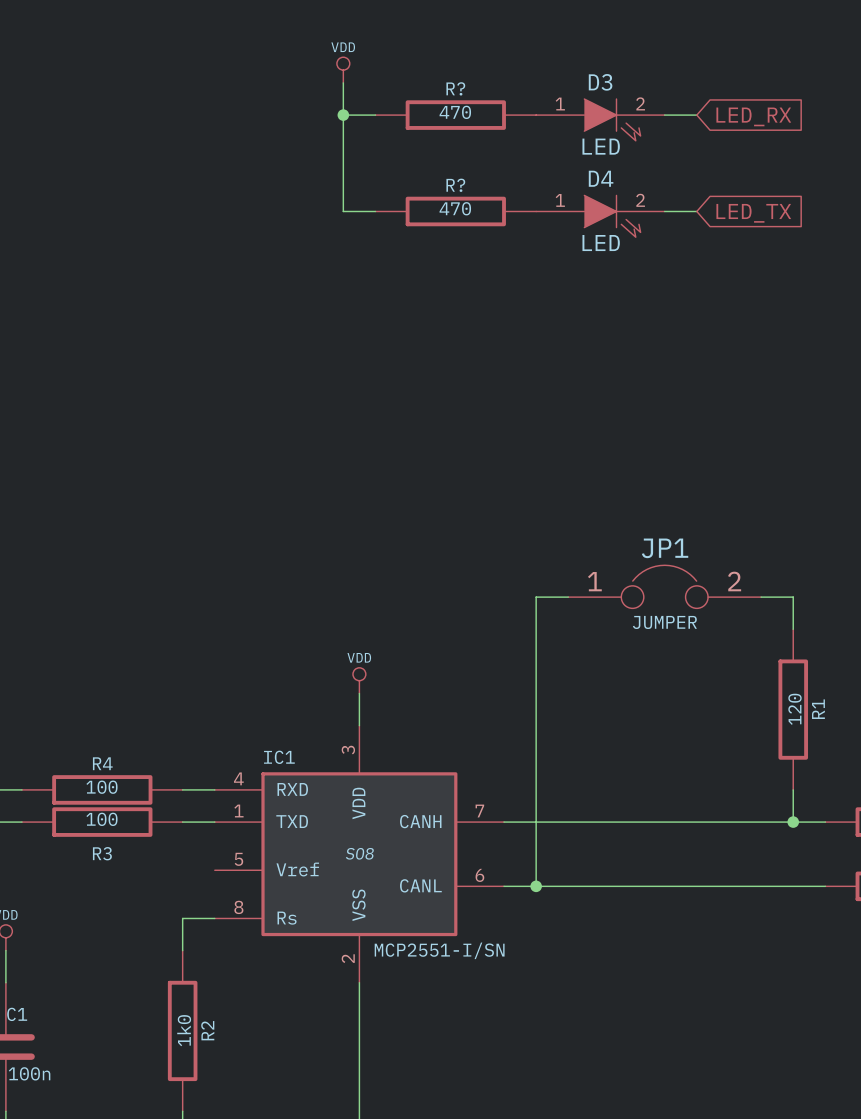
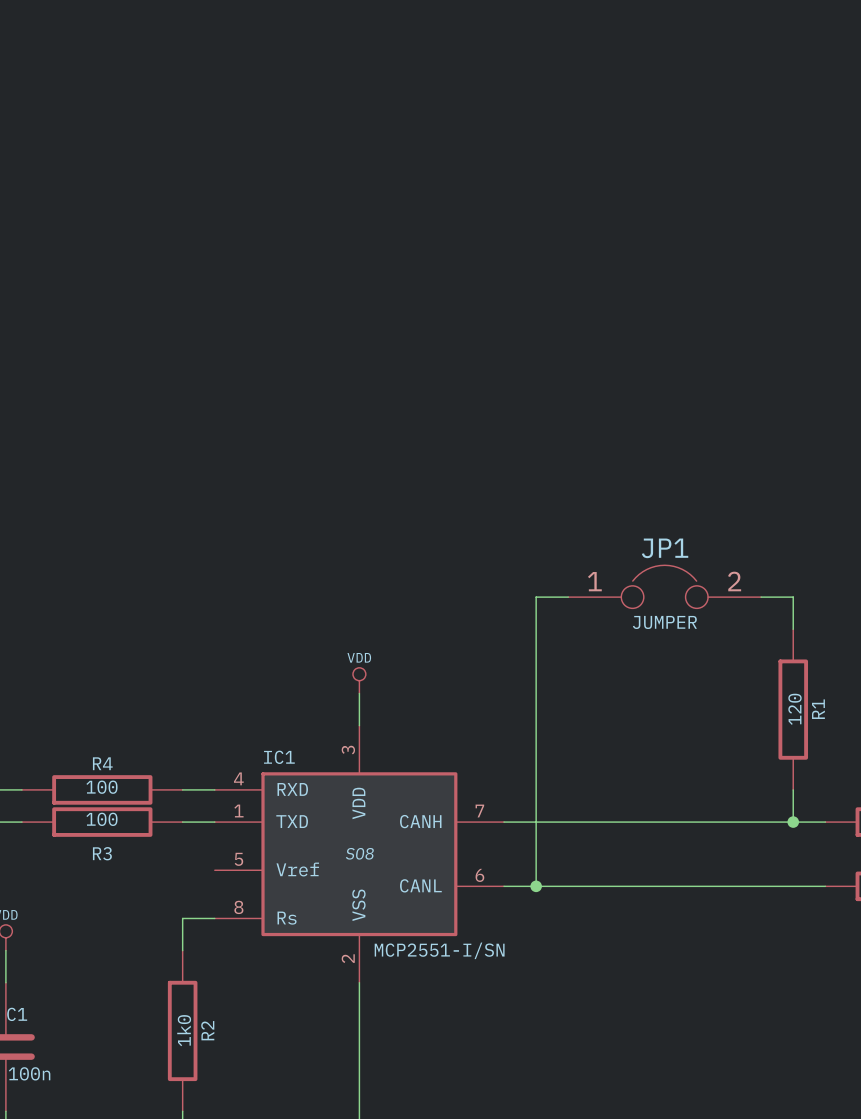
power symbol: VDD (343, 70) -> none
wire: (343, 82) (343, 211) (375, 211) -> none
wire: (343, 115) (375, 115) -> none
junction: (343, 115) -> none
R?: 470 (455, 115) -> none
wire: (664, 115) (696, 115) -> none
global label: LED_RX (753, 116) -> none
D3: LED (600, 119) -> none
R?: 470 (455, 211) -> none
wire: (664, 211) (696, 211) -> none
global label: LED_TX (753, 213) -> none
D4: LED (600, 216) -> none

